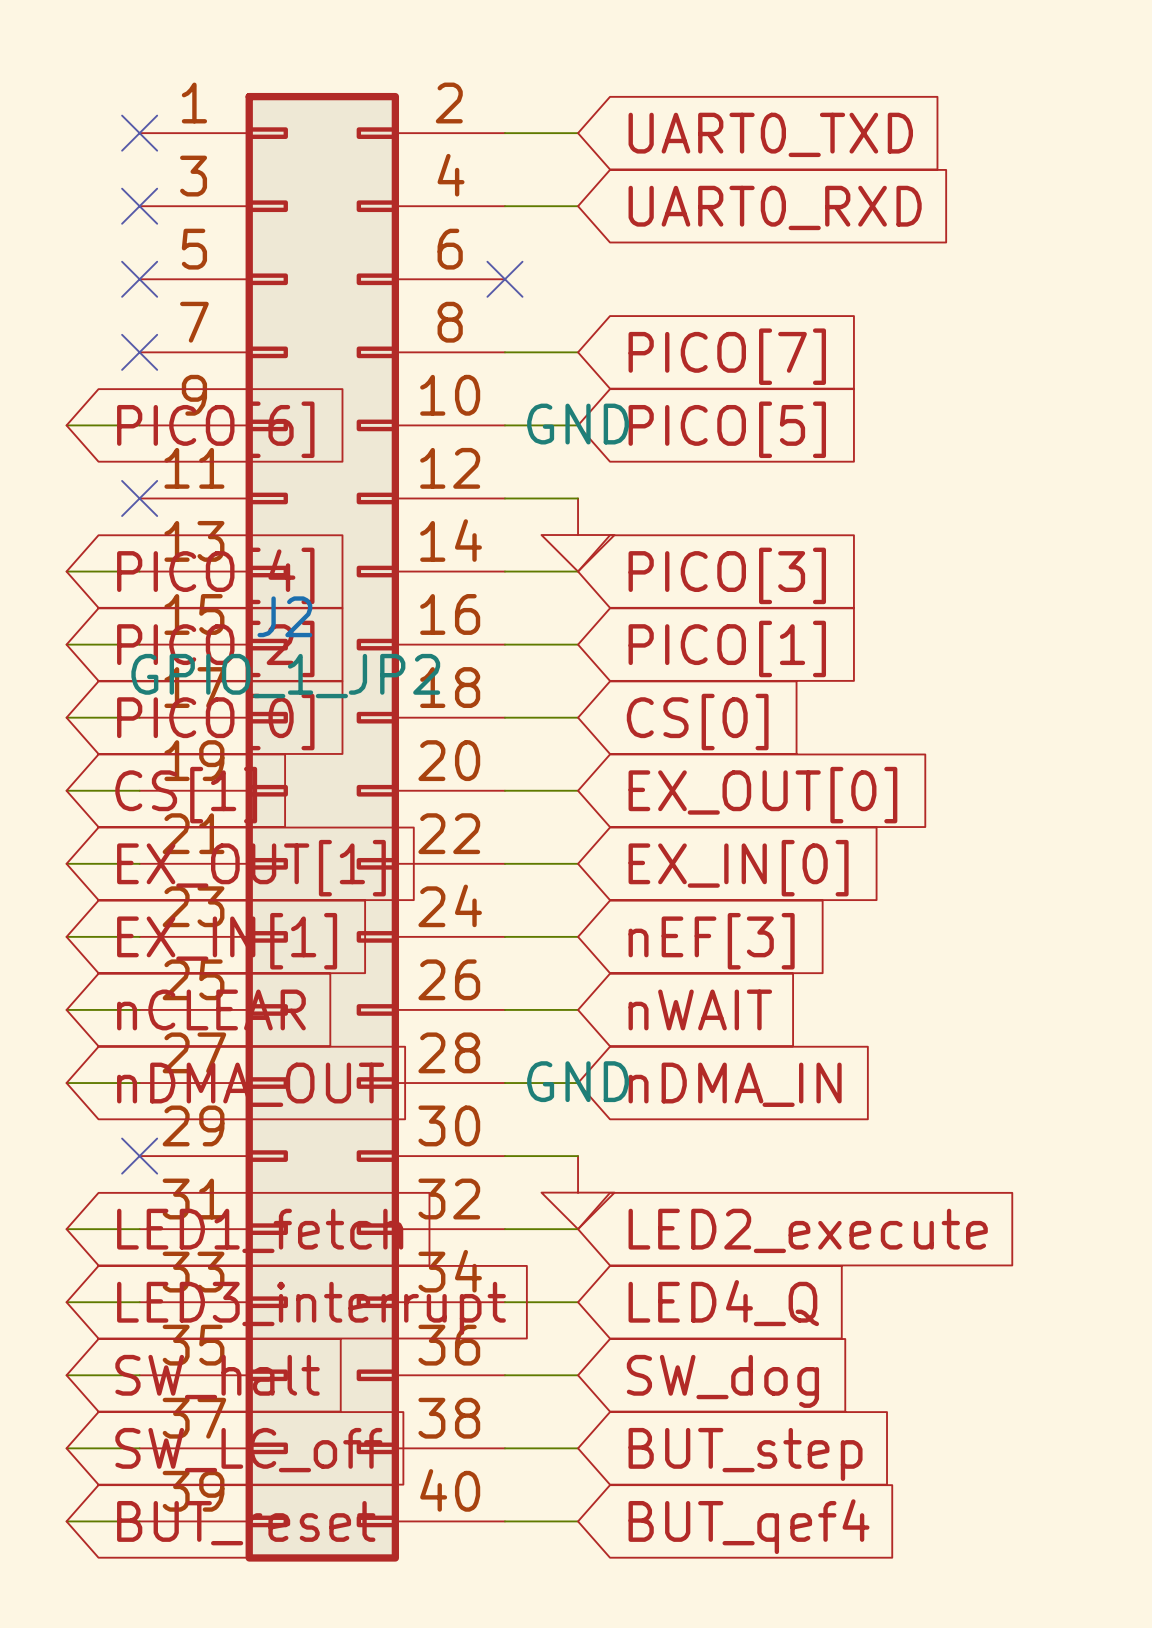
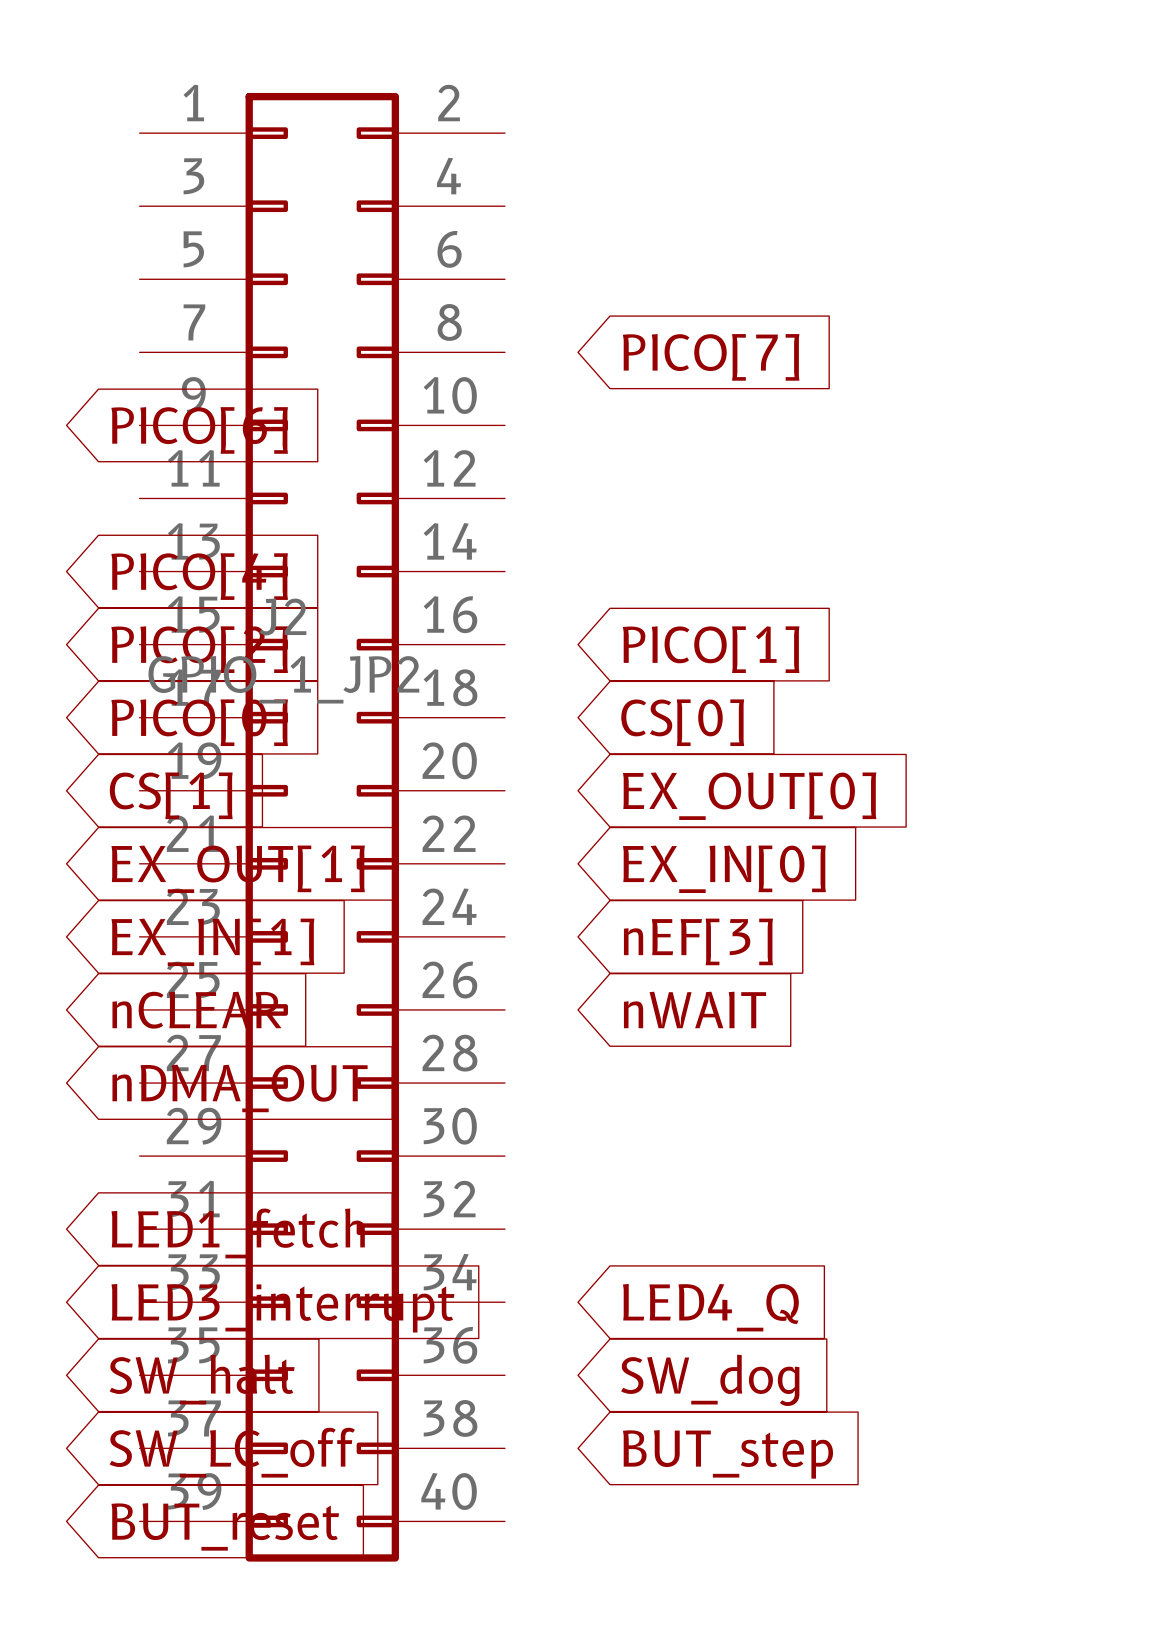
no-connect mark: (139, 133) -> none
wire: (504, 133) (578, 133) -> none
global label: UART0_TXD (770, 134) -> none
no-connect mark: (139, 206) -> none
wire: (504, 206) (578, 206) -> none
global label: UART0_RXD (775, 207) -> none
no-connect mark: (139, 279) -> none
no-connect mark: (504, 279) -> none
no-connect mark: (139, 352) -> none
wire: (504, 352) (578, 352) -> none
wire: (66, 425) (139, 425) -> none
wire: (504, 425) (578, 425) -> none
global label: PICO[5] (727, 429) -> none
no-connect mark: (139, 498) -> none
wire: (504, 498) (578, 498) -> none
power symbol: GND (578, 535) -> none
wire: (66, 571) (139, 571) -> none
wire: (504, 571) (578, 571) -> none
global label: PICO[3] (727, 575) -> none
wire: (66, 644) (139, 644) -> none
wire: (504, 644) (578, 644) -> none
wire: (66, 717) (139, 717) -> none
wire: (504, 717) (578, 717) -> none
wire: (66, 790) (139, 790) -> none
wire: (504, 790) (578, 790) -> none
wire: (66, 863) (139, 863) -> none
wire: (504, 863) (578, 863) -> none
wire: (66, 936) (139, 936) -> none
wire: (504, 936) (578, 936) -> none
wire: (66, 1009) (139, 1009) -> none
wire: (504, 1009) (578, 1009) -> none
wire: (66, 1083) (139, 1083) -> none
wire: (504, 1083) (578, 1083) -> none
global label: nDMA_IN (735, 1084) -> none
no-connect mark: (139, 1156) -> none
wire: (504, 1156) (578, 1156) -> none
power symbol: GND (578, 1192) -> none
wire: (66, 1229) (139, 1229) -> none
wire: (504, 1229) (578, 1229) -> none
global label: LED2_execute (808, 1230) -> none
wire: (66, 1302) (139, 1302) -> none
wire: (504, 1302) (578, 1302) -> none
wire: (66, 1375) (139, 1375) -> none
wire: (504, 1375) (578, 1375) -> none
wire: (66, 1448) (139, 1448) -> none
wire: (504, 1448) (578, 1448) -> none
wire: (66, 1521) (139, 1521) -> none
wire: (504, 1521) (578, 1521) -> none
global label: BUT_qef4 (749, 1526) -> none

